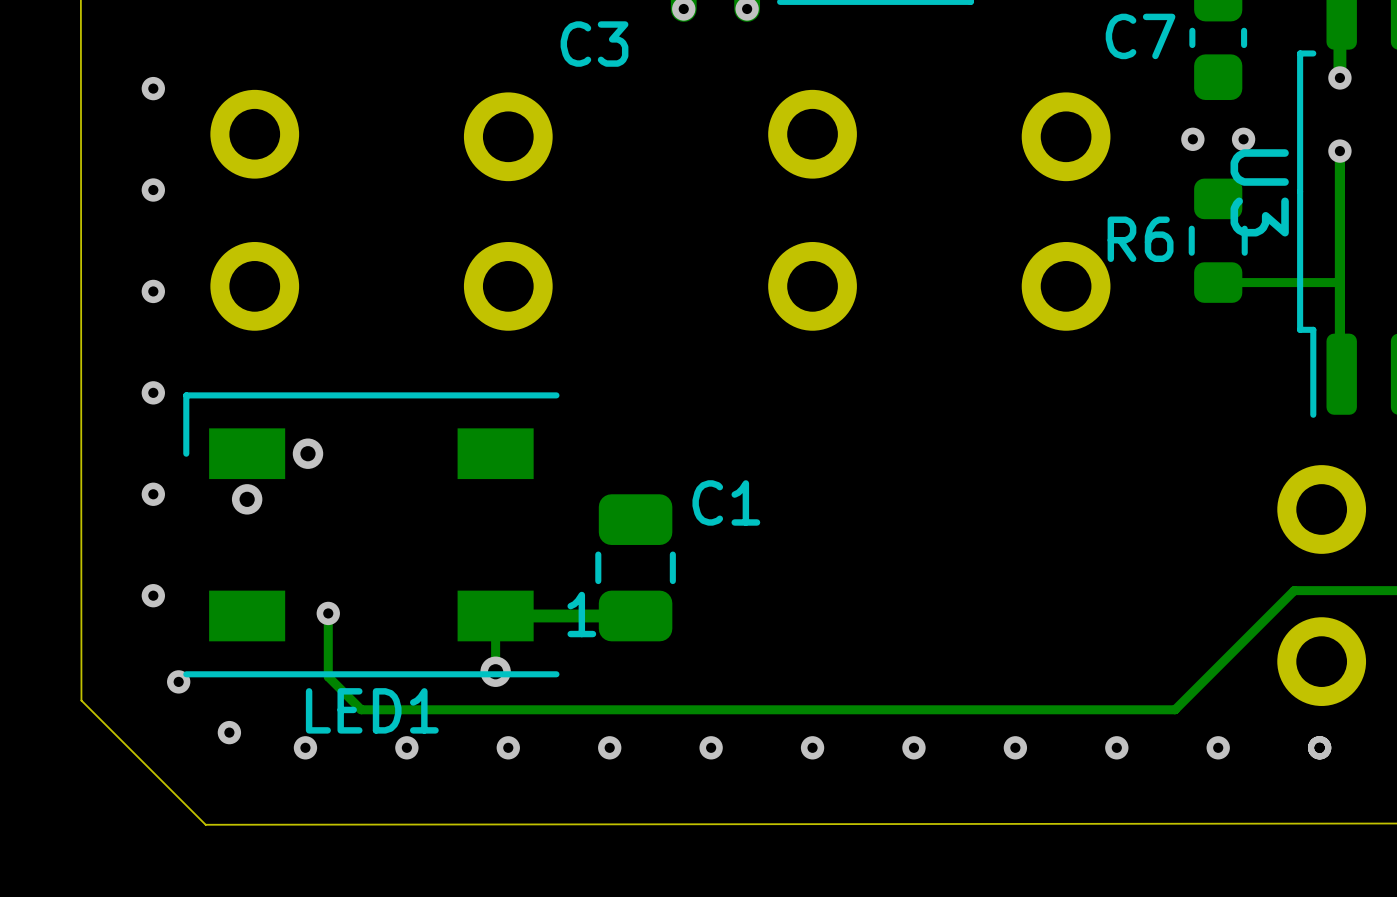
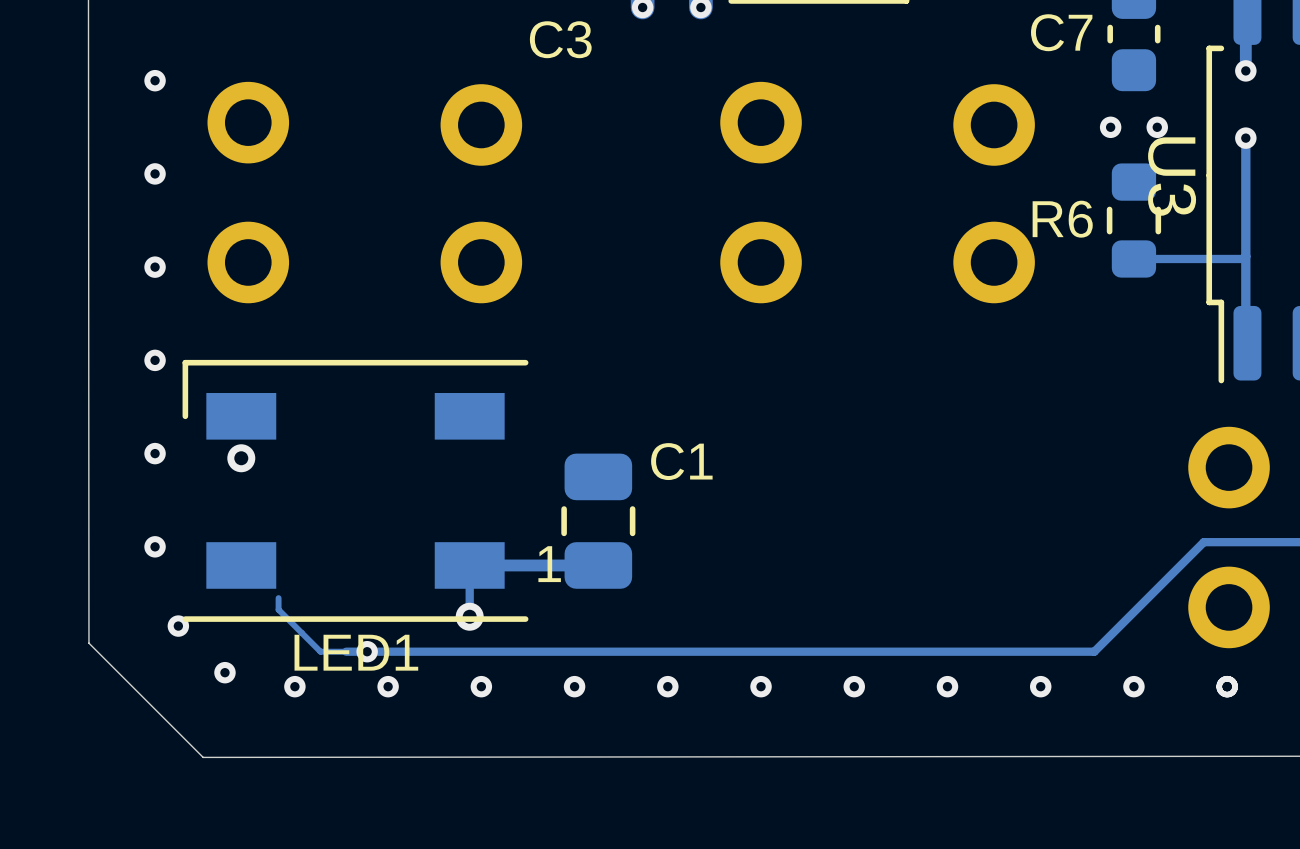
via: (307, 453) -> none
track: (328, 613) (328, 676) (361, 709) -> (278, 598) (278, 609) (320, 651) (346, 651)
via position: (328, 613) -> (367, 651)

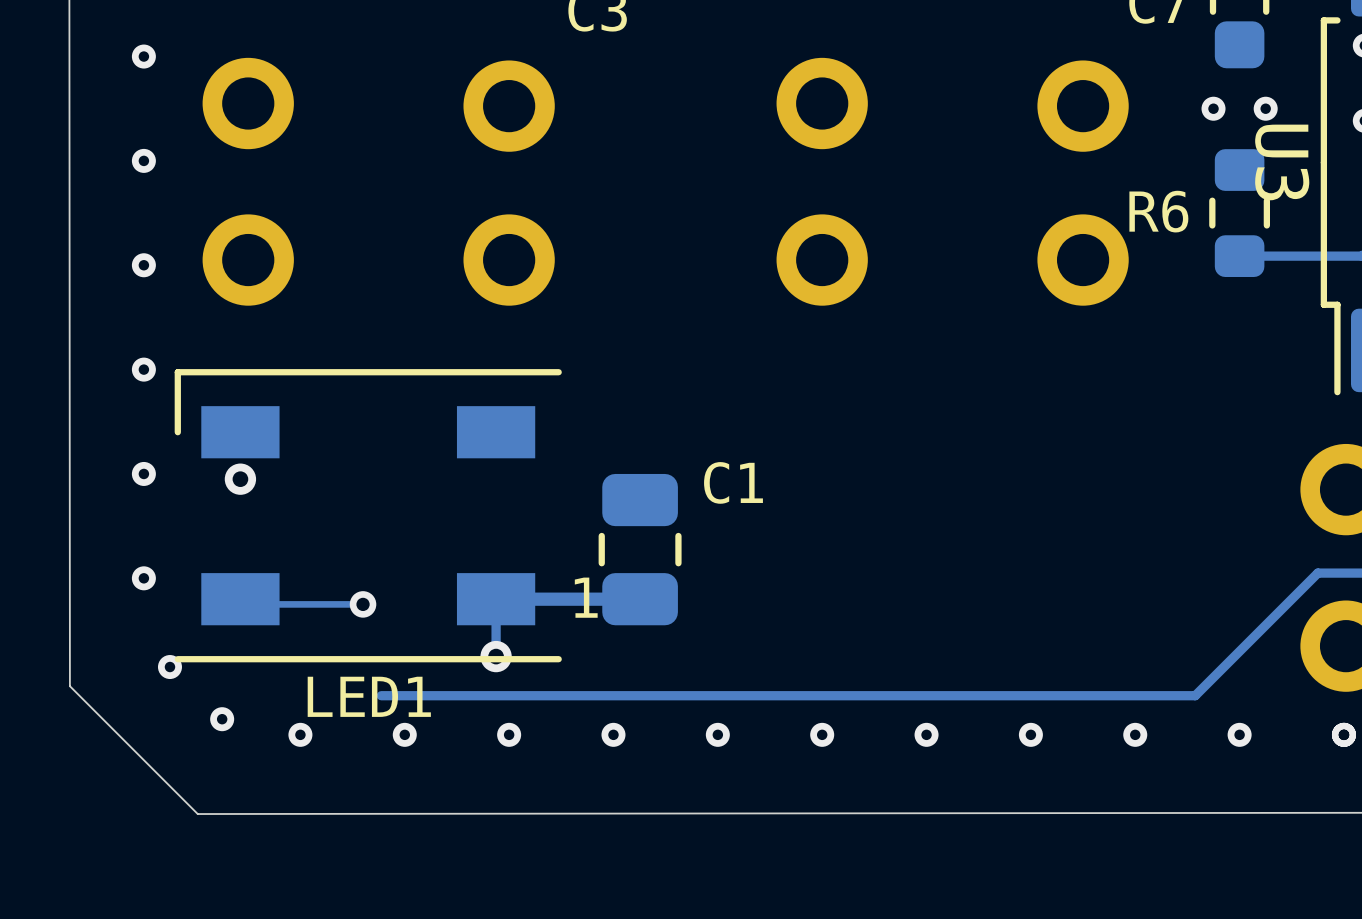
track: none -> (240, 599) (245, 604) (363, 604)
via: none -> (363, 604)
track: (278, 598) (278, 609) (320, 651) (367, 651) -> none
via: (367, 651) -> none

